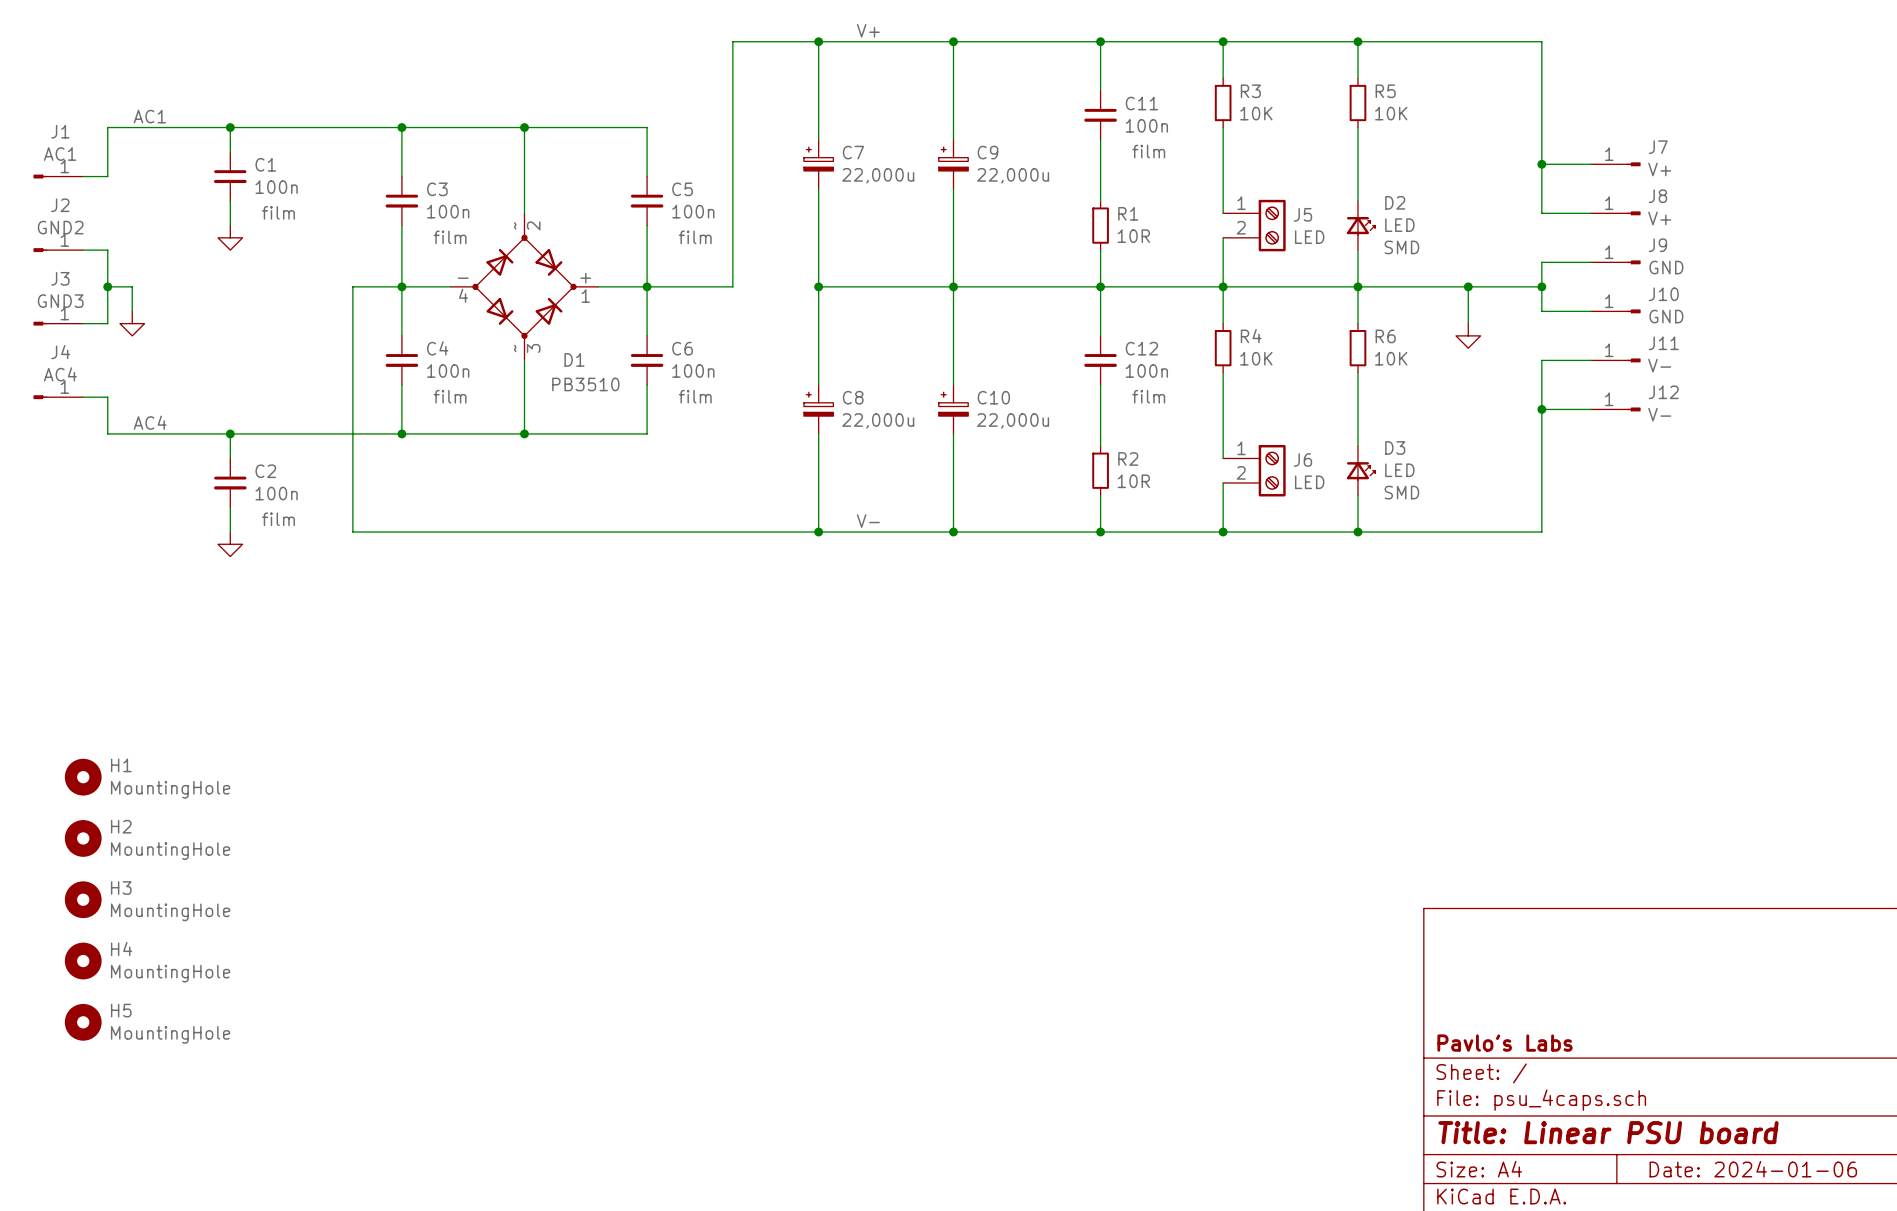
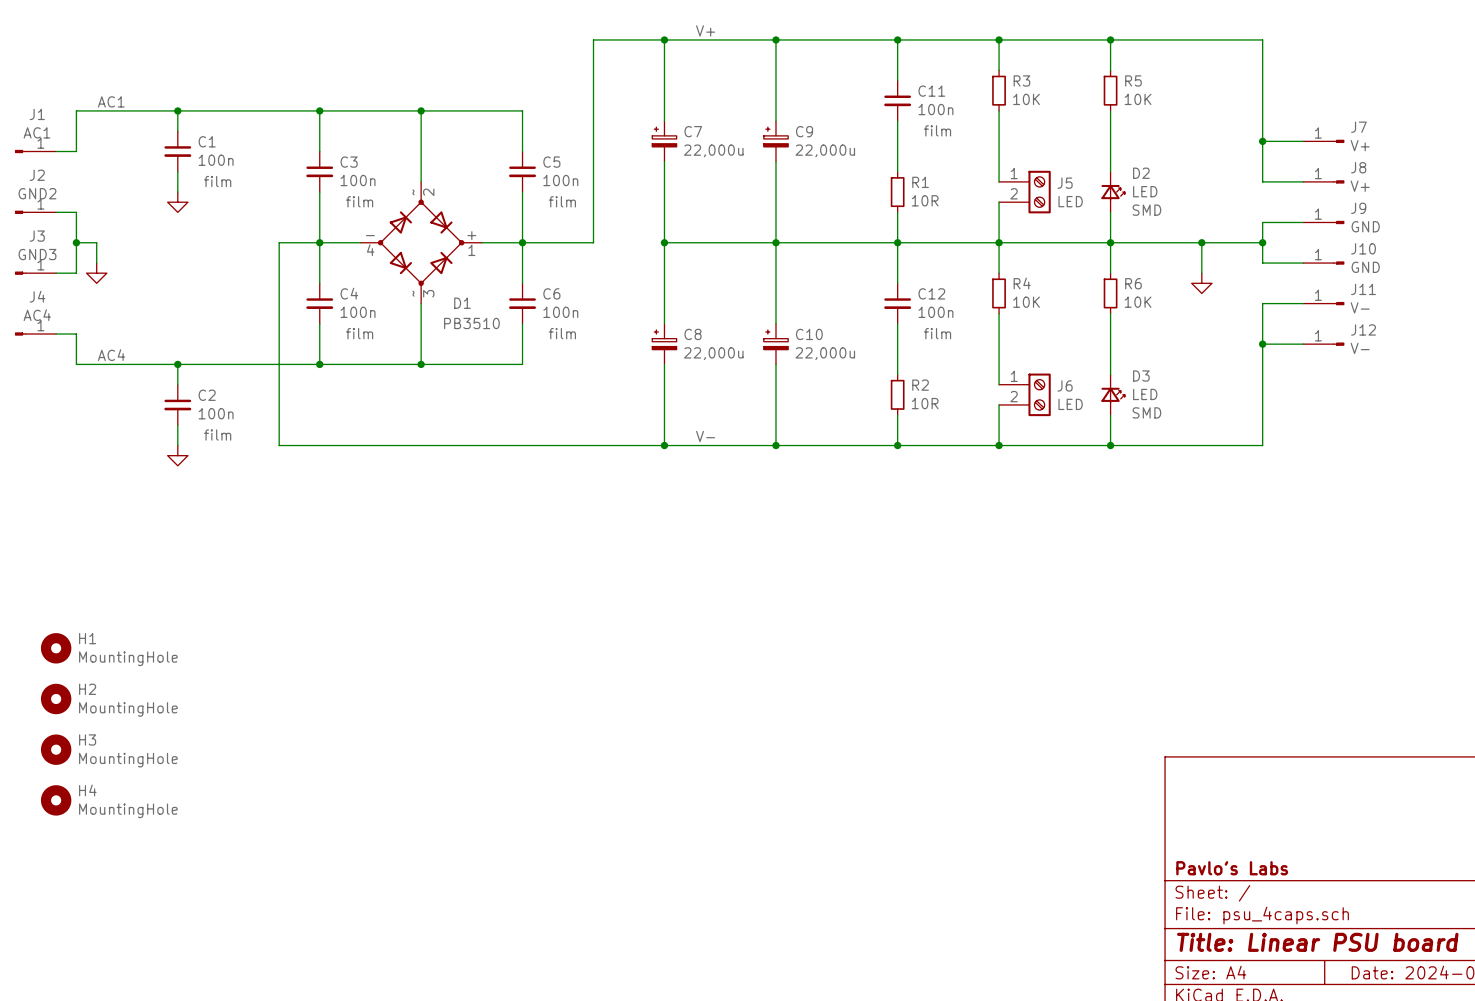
H5: MountingHole (83, 1022) -> none

